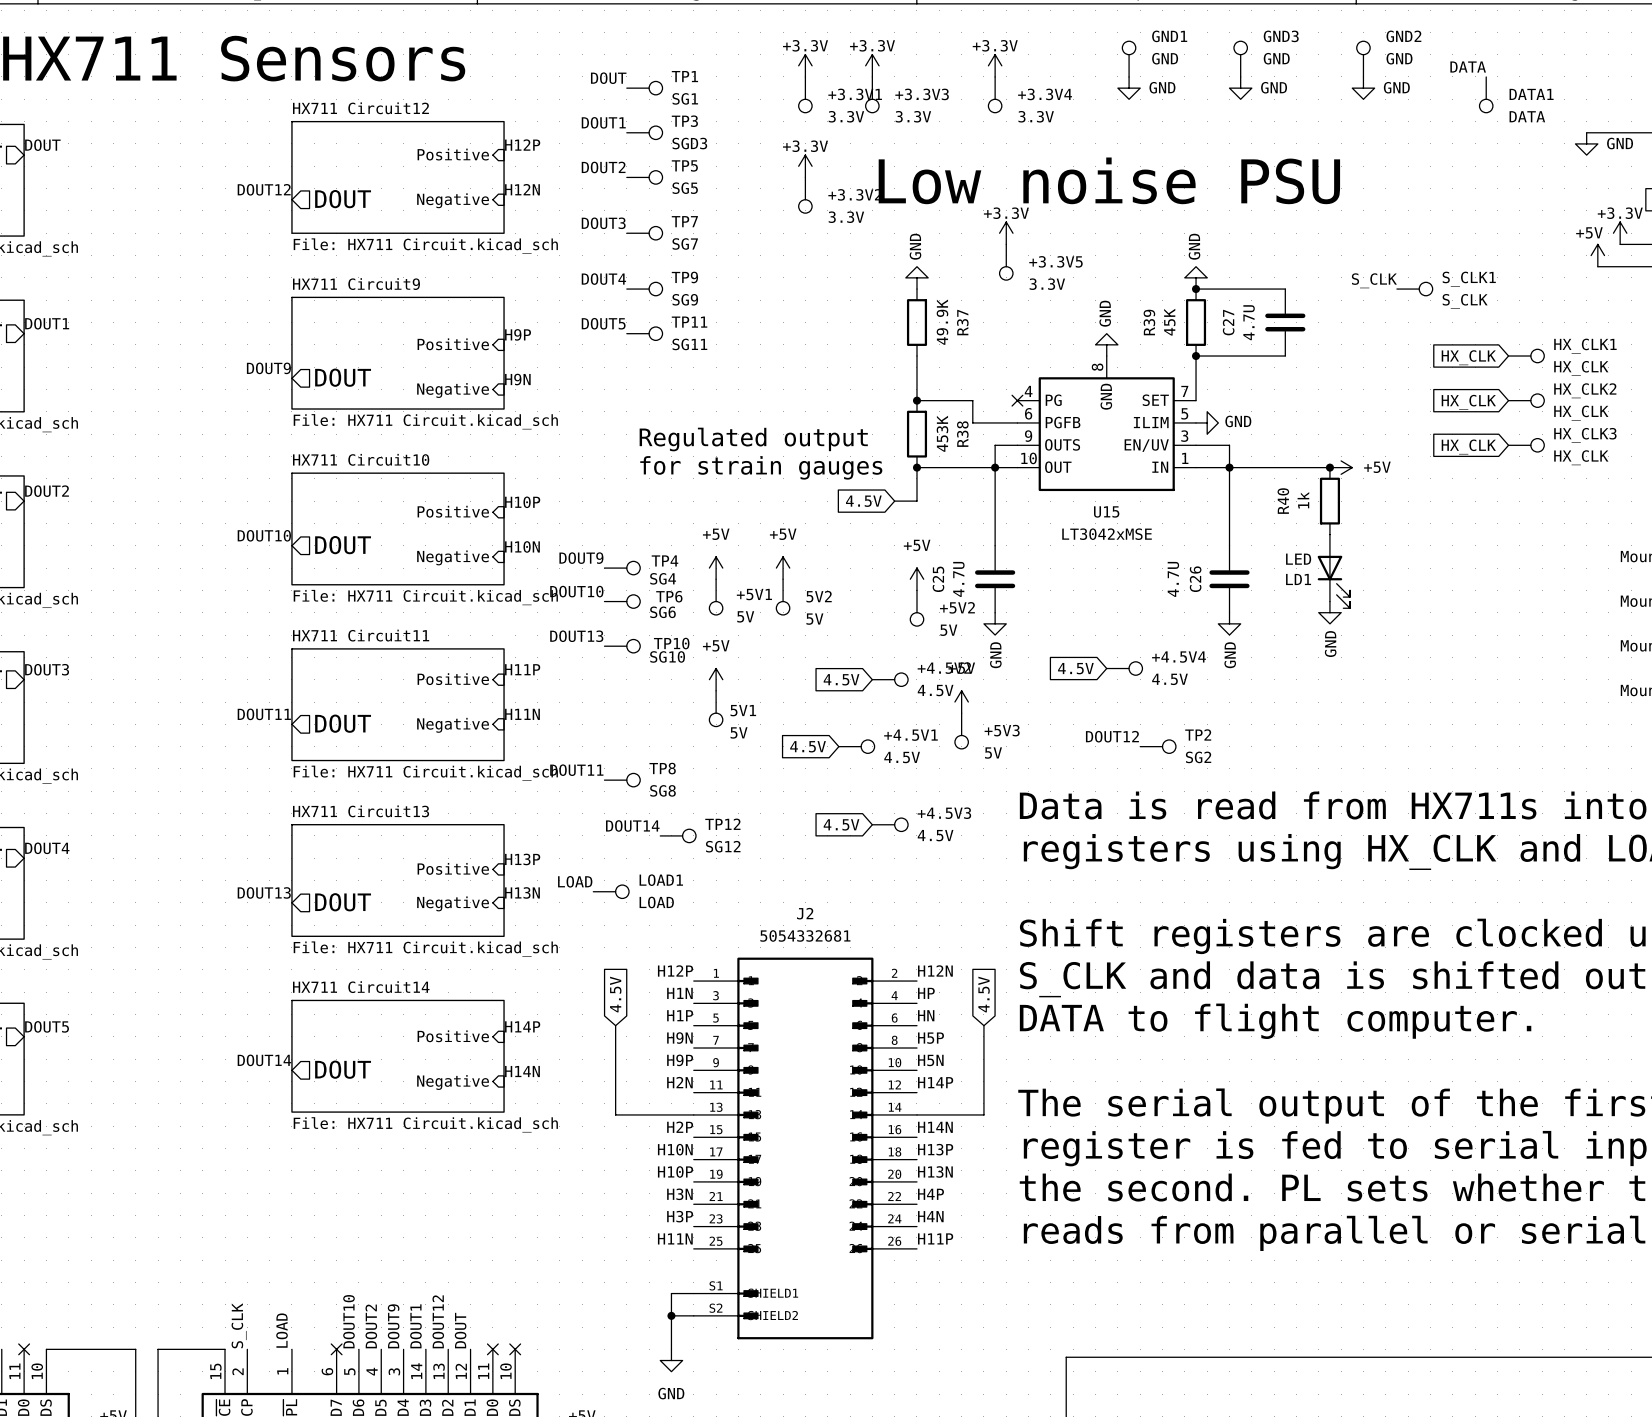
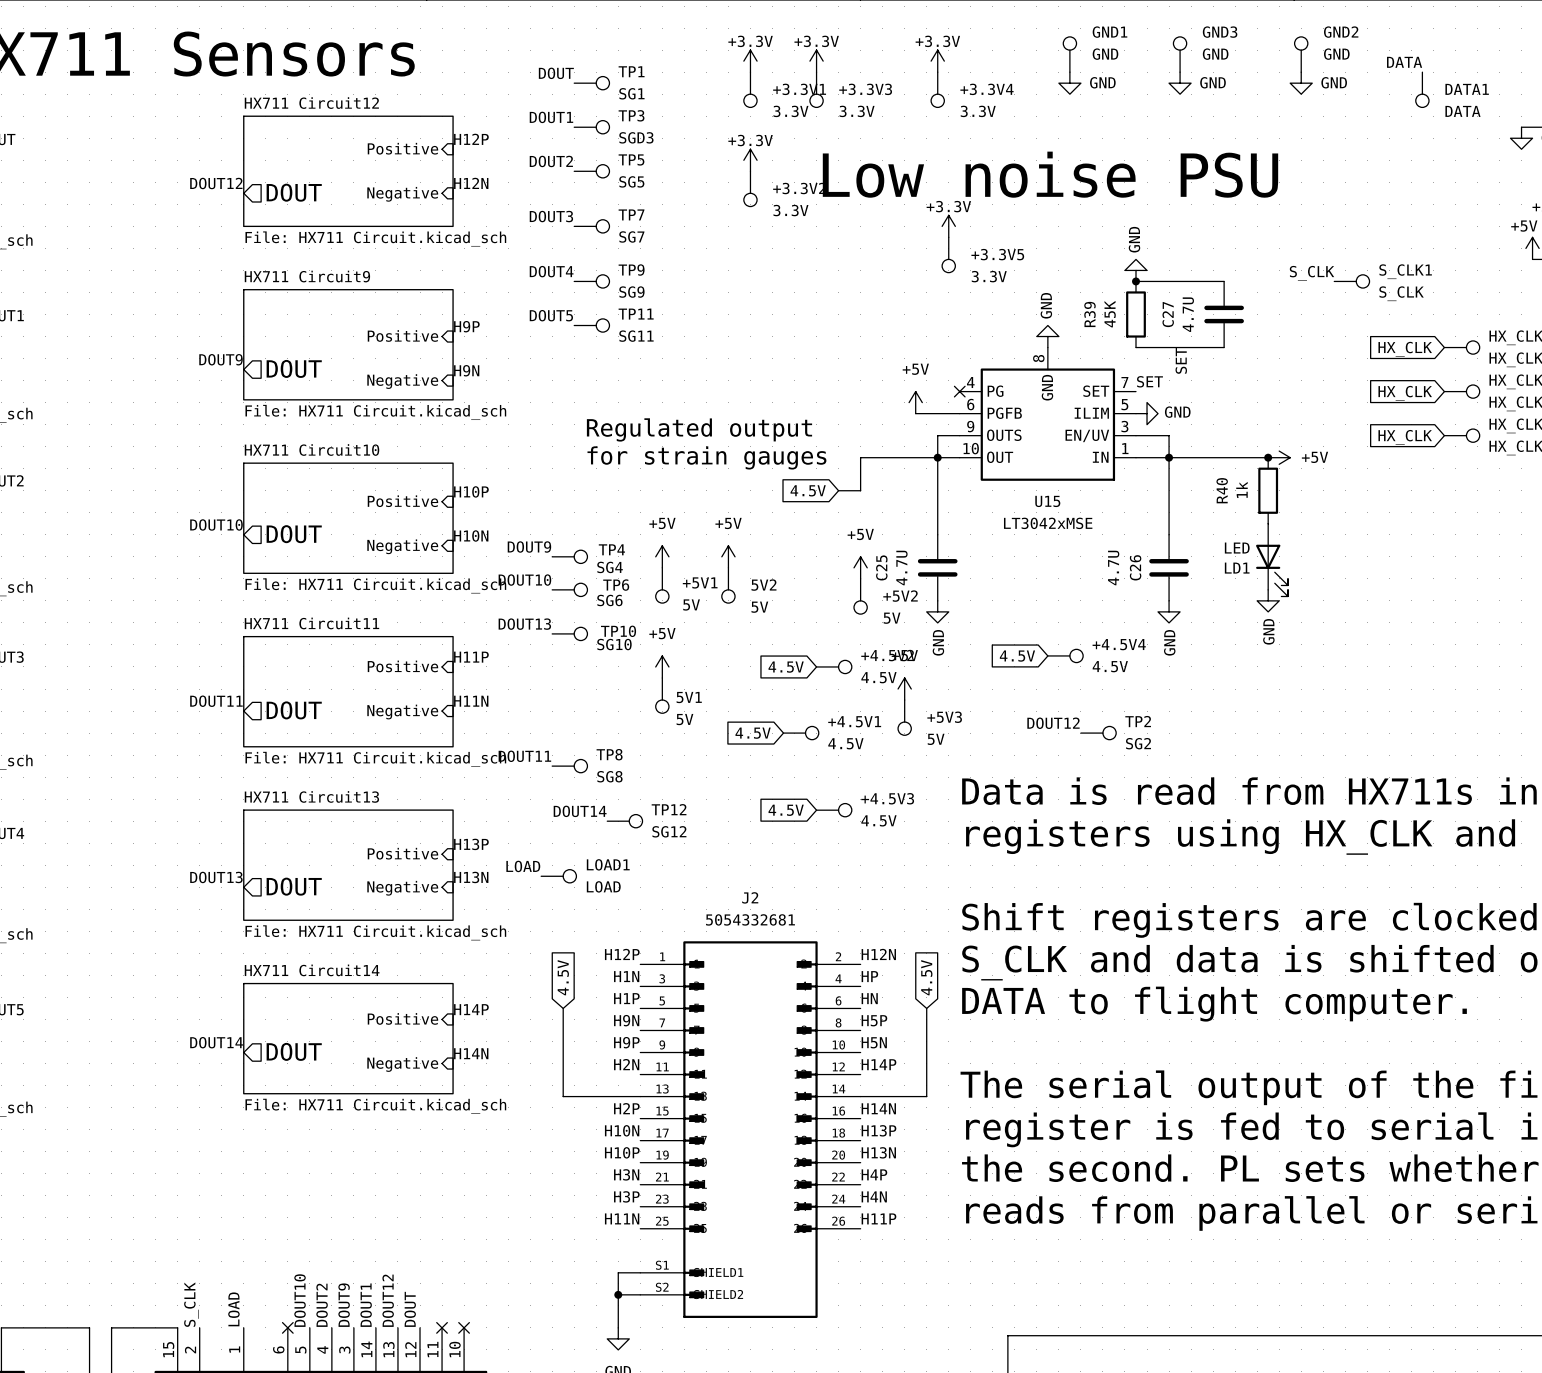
power symbol: GND (916, 277) -> none
R37: 49.9K (916, 322) -> none
wire: (916, 356) (916, 400) (972, 400) (972, 422) -> none
wire: (1196, 356) (1196, 400) -> none
junction: (1196, 356) -> none
label: none -> SET (1181, 360)
label: none -> SET (1149, 381)
junction: (916, 400) -> none
power symbol: none -> +5V (915, 402)
R38: 453K (916, 434) -> none
junction: (916, 467) -> none

